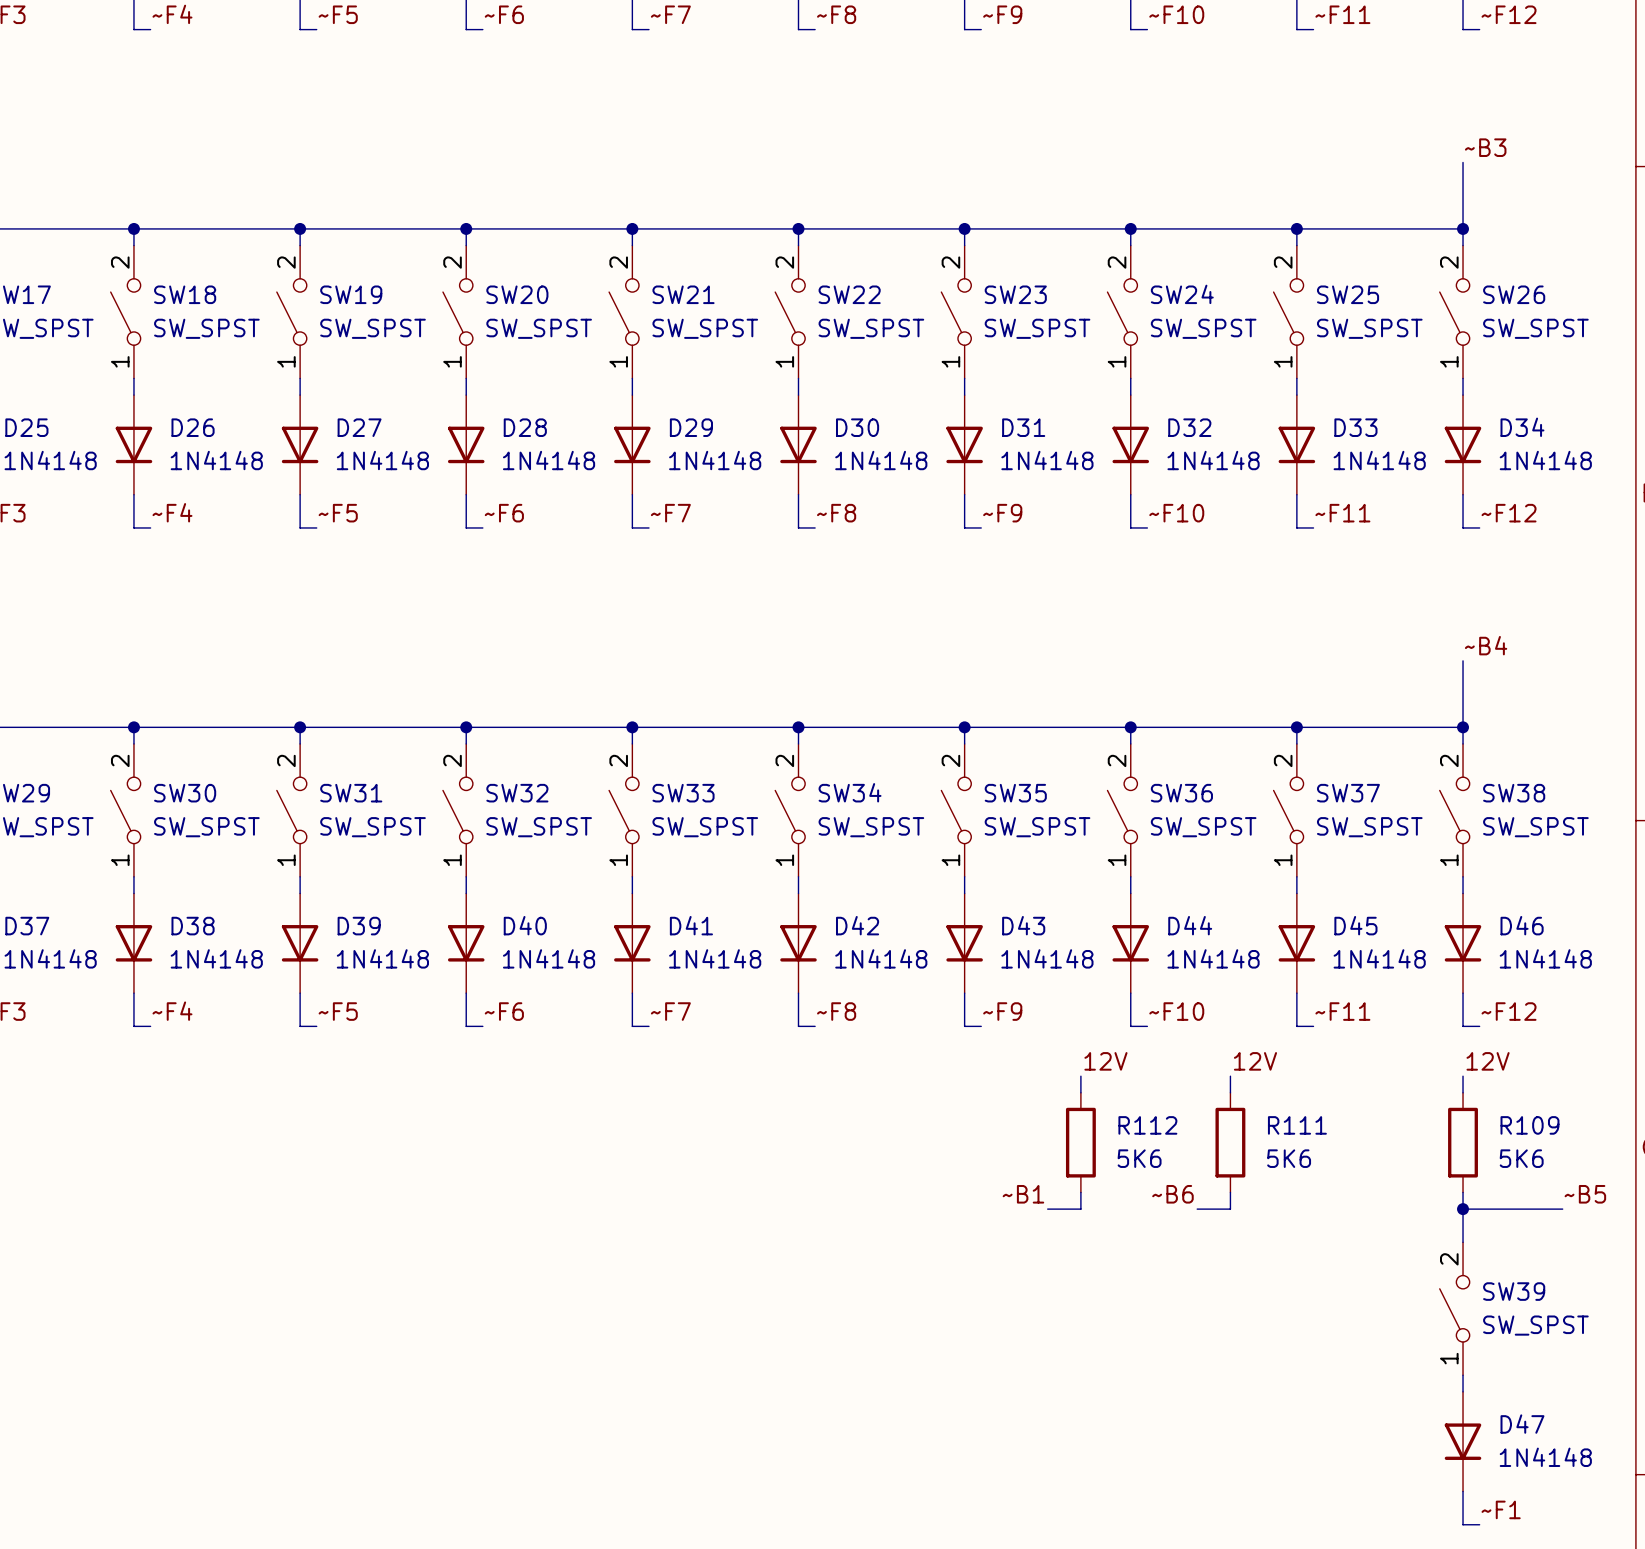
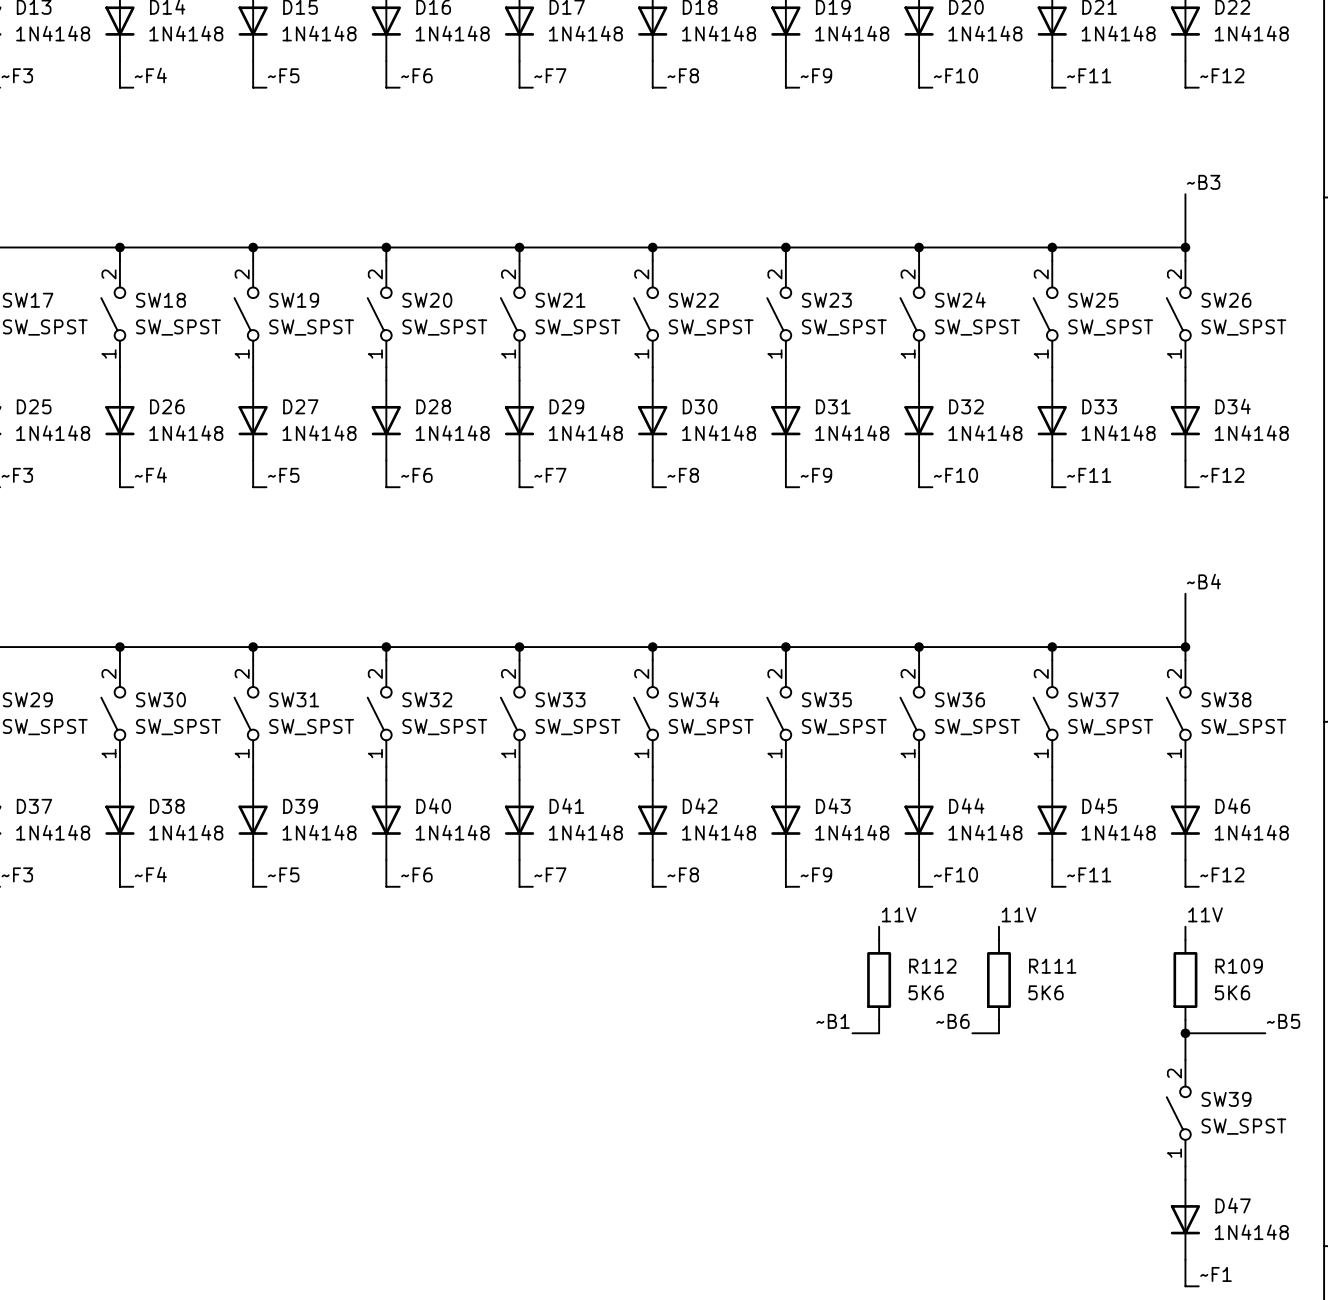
label: 12V (1105, 1061) -> 11V (899, 914)
label: 12V (1255, 1061) -> 11V (1019, 914)
label: 12V (1488, 1061) -> 11V (1205, 914)

